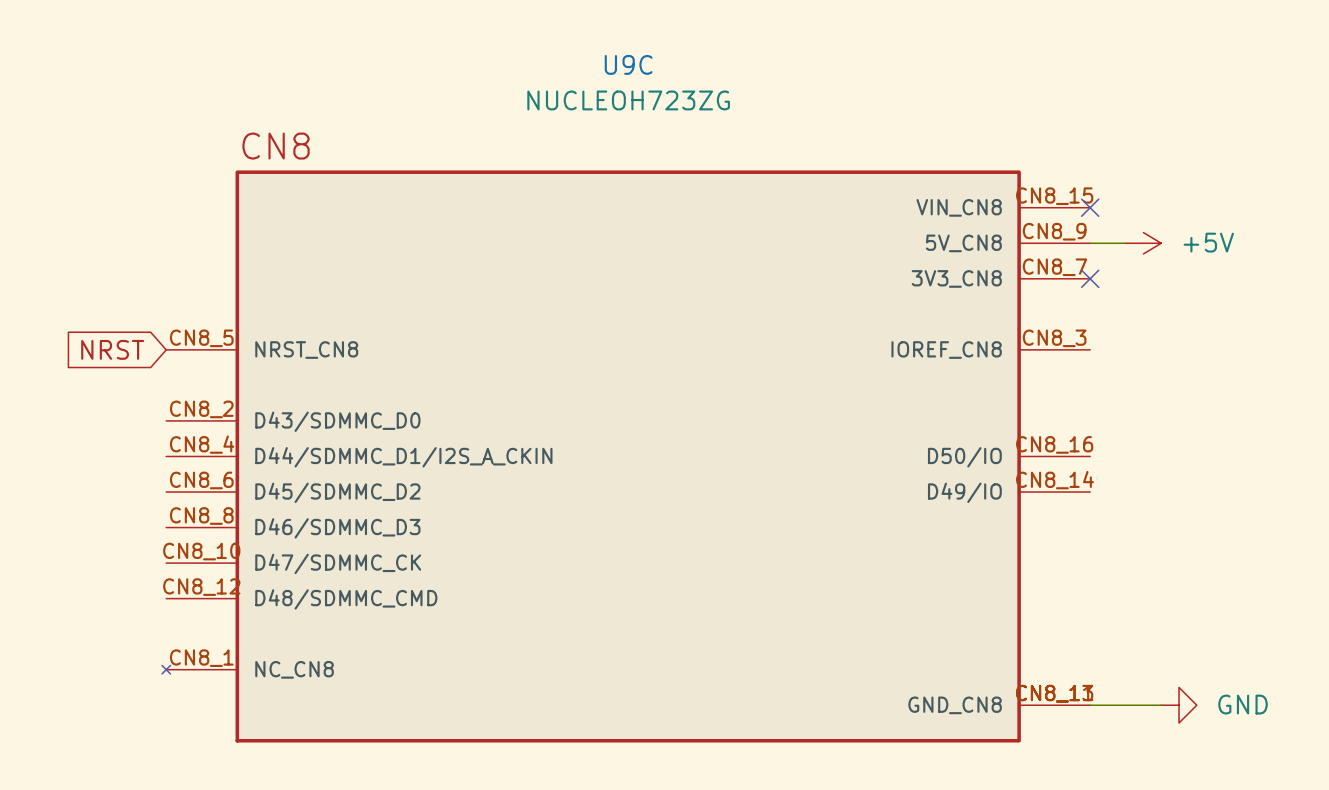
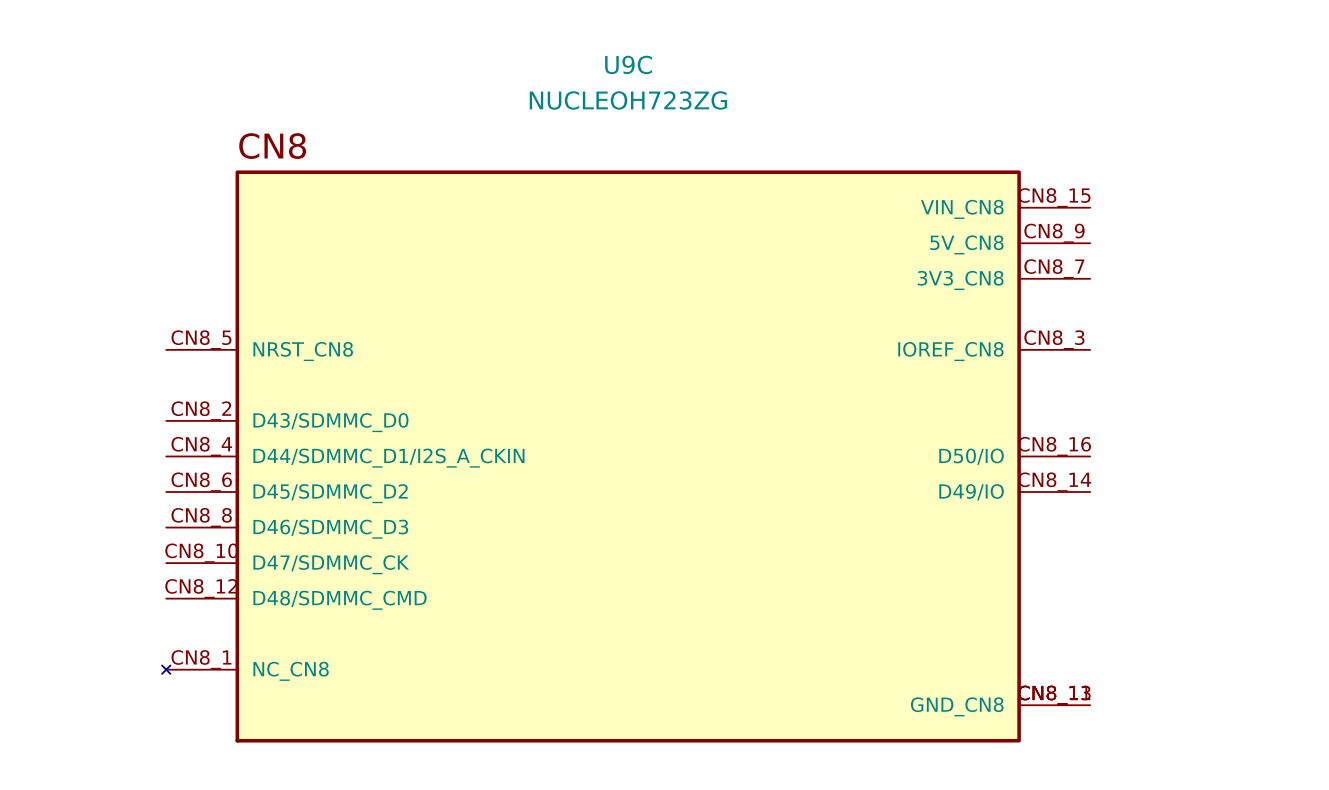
no-connect mark: (1090, 207) -> none
wire: (1090, 243) (1125, 243) -> none
power symbol: +5V (1143, 243) -> none
no-connect mark: (1090, 278) -> none
global label: NRST (112, 349) -> none
wire: (1090, 705) (1161, 705) -> none
power symbol: GND (1179, 705) -> none

